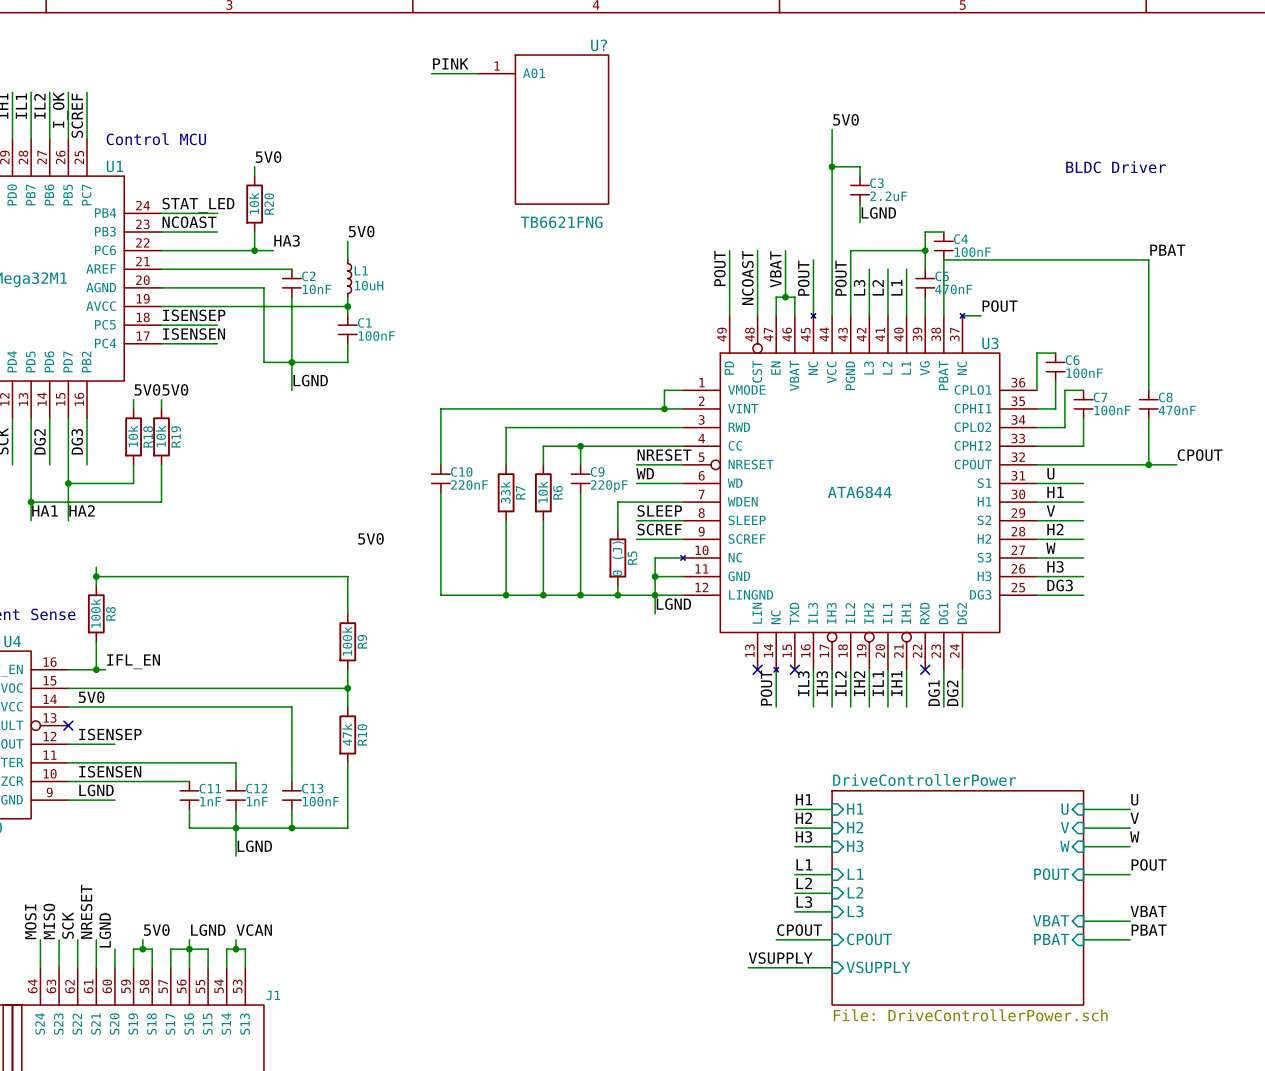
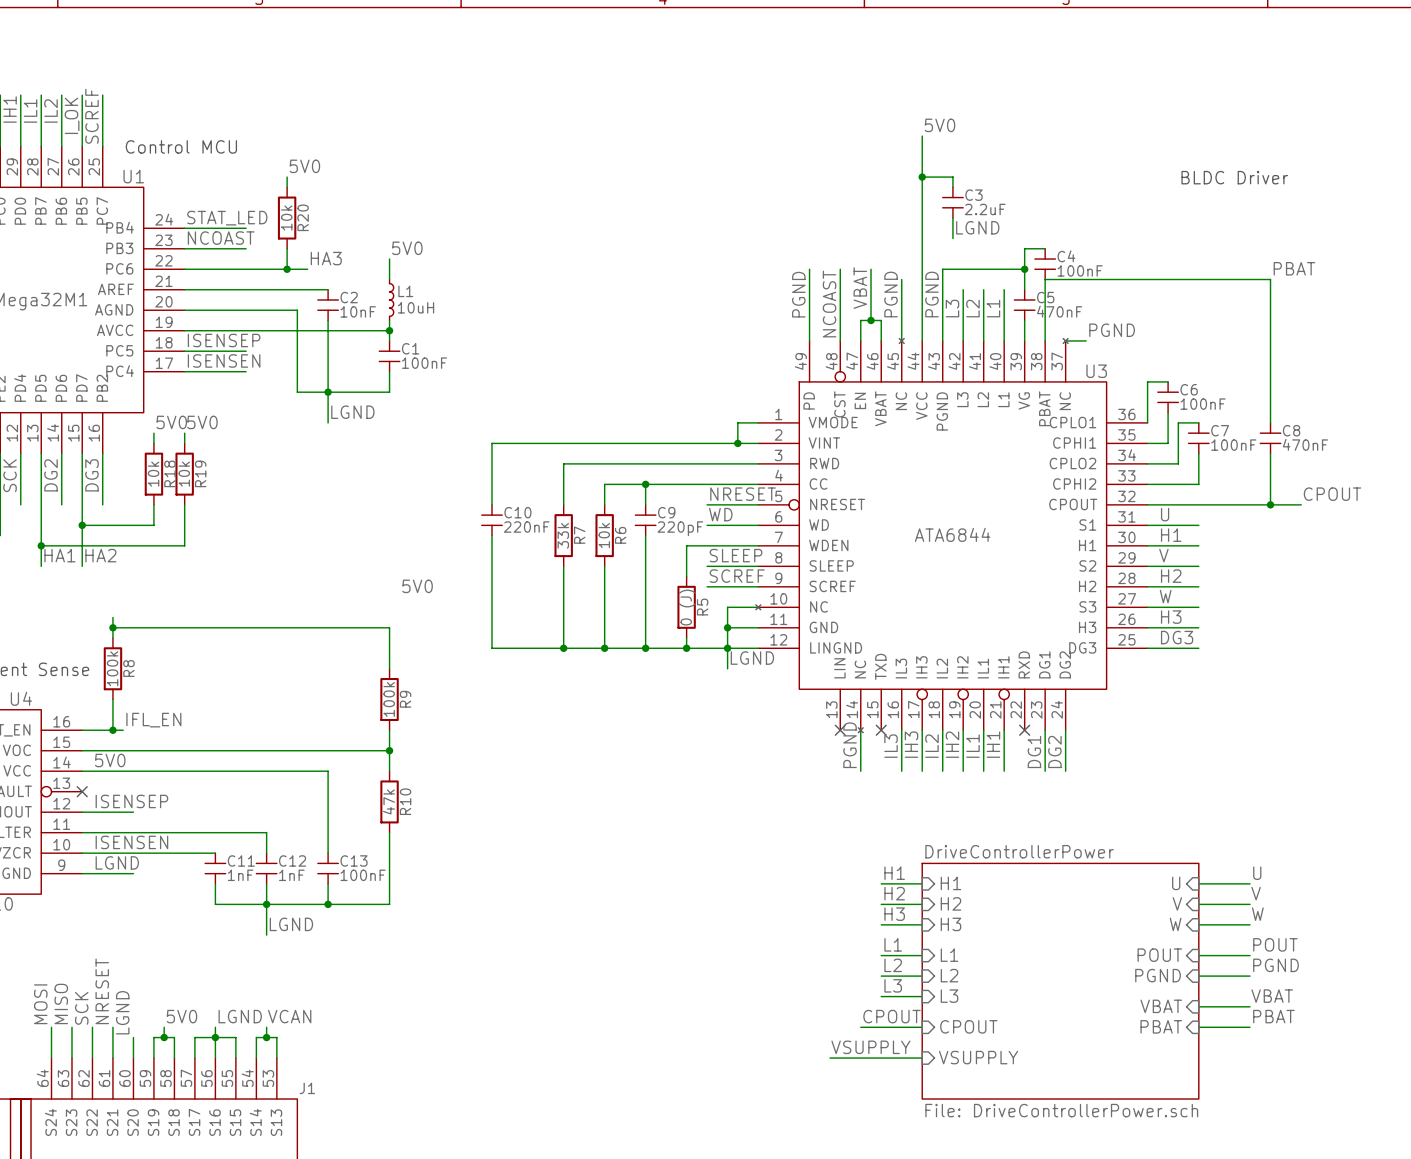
label: PINK (450, 63) -> none
wire: (431, 73) (478, 73) -> none
U?: TB6621FNG (543, 129) -> none
label: POUT (719, 268) -> PGND (798, 294)
label: POUT (803, 278) -> PGND (891, 294)
label: POUT (840, 278) -> PGND (931, 294)
label: POUT (1000, 306) -> PGND (1112, 330)
label: POUT (766, 687) -> PGND (850, 745)
label: none -> PGND (1276, 965)
sheet pin: none -> PGND (1158, 975)
wire: none -> (1198, 976) (1250, 976)

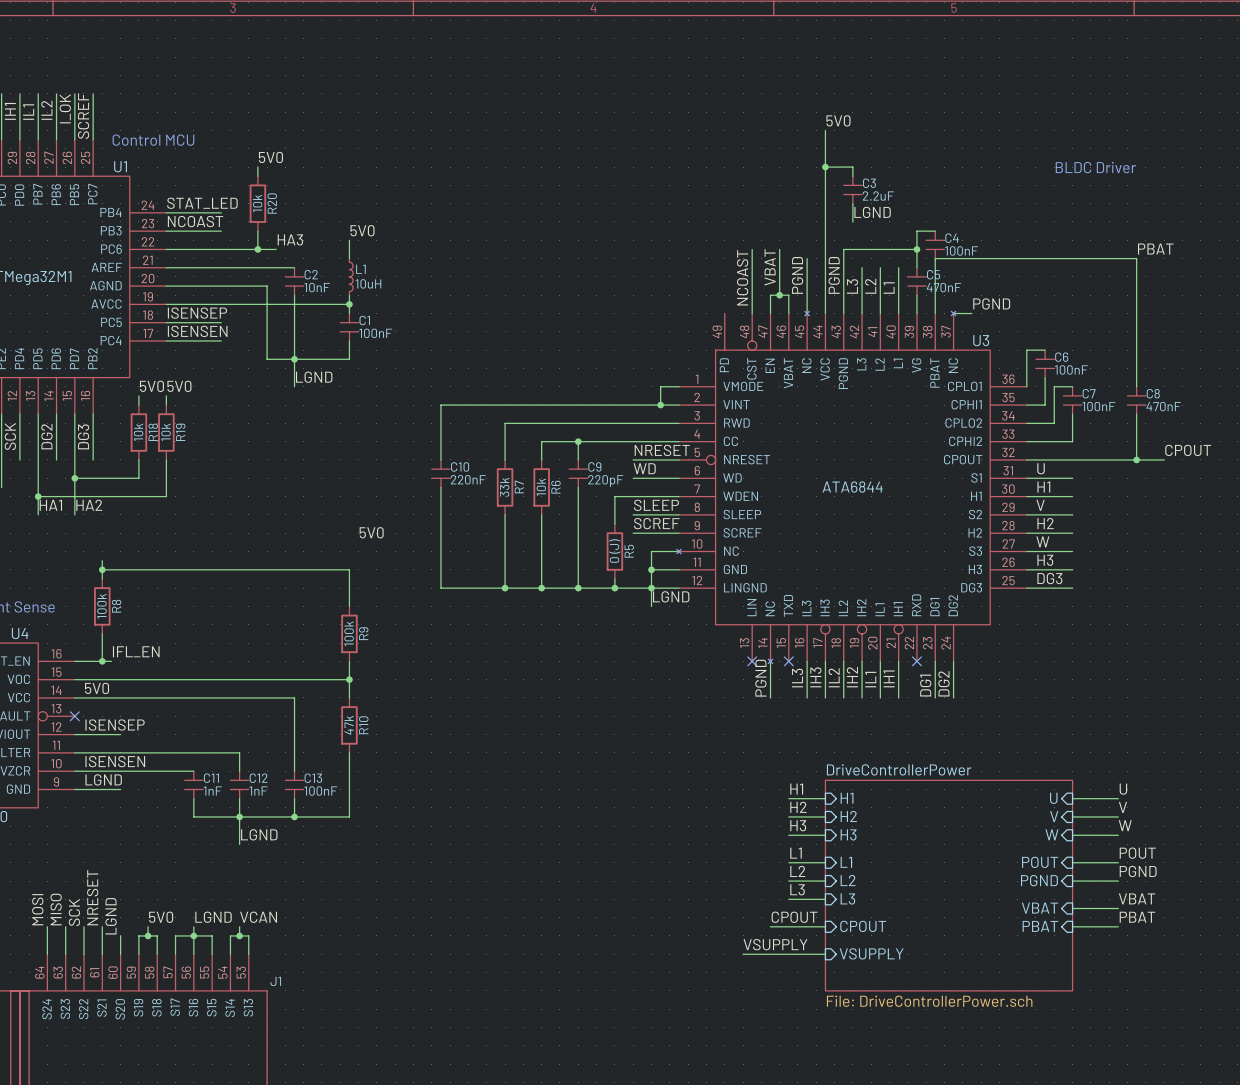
wire: (809, 269) (809, 340) -> none
label: PGND (798, 294) -> none

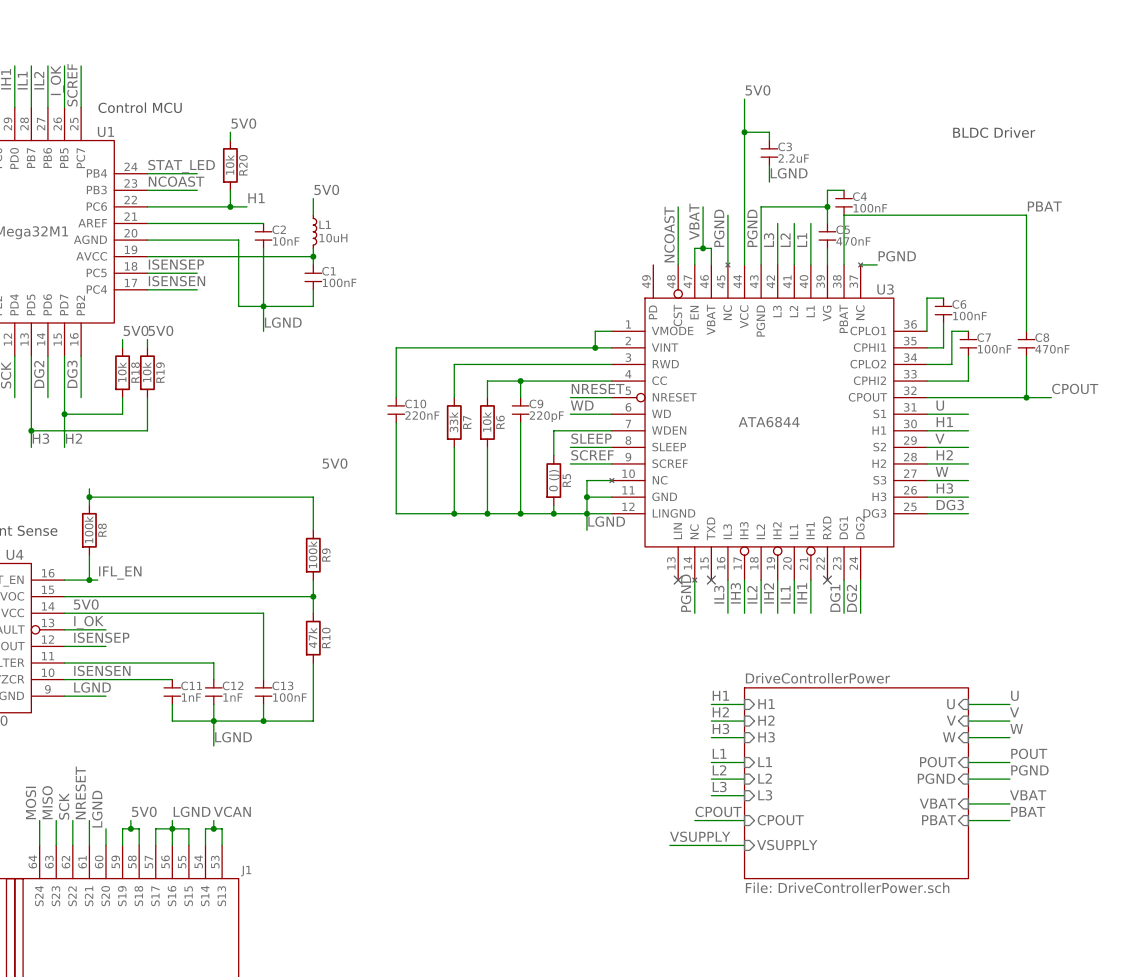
label: HA3 (290, 239) -> H1 (256, 198)
label: HA1 (50, 505) -> H3 (40, 438)
label: HA2 (89, 505) -> H2 (73, 438)
label: none -> I_OK (88, 622)
wire: none -> (64, 629) (105, 629)
no-connect mark: (74, 716) -> none

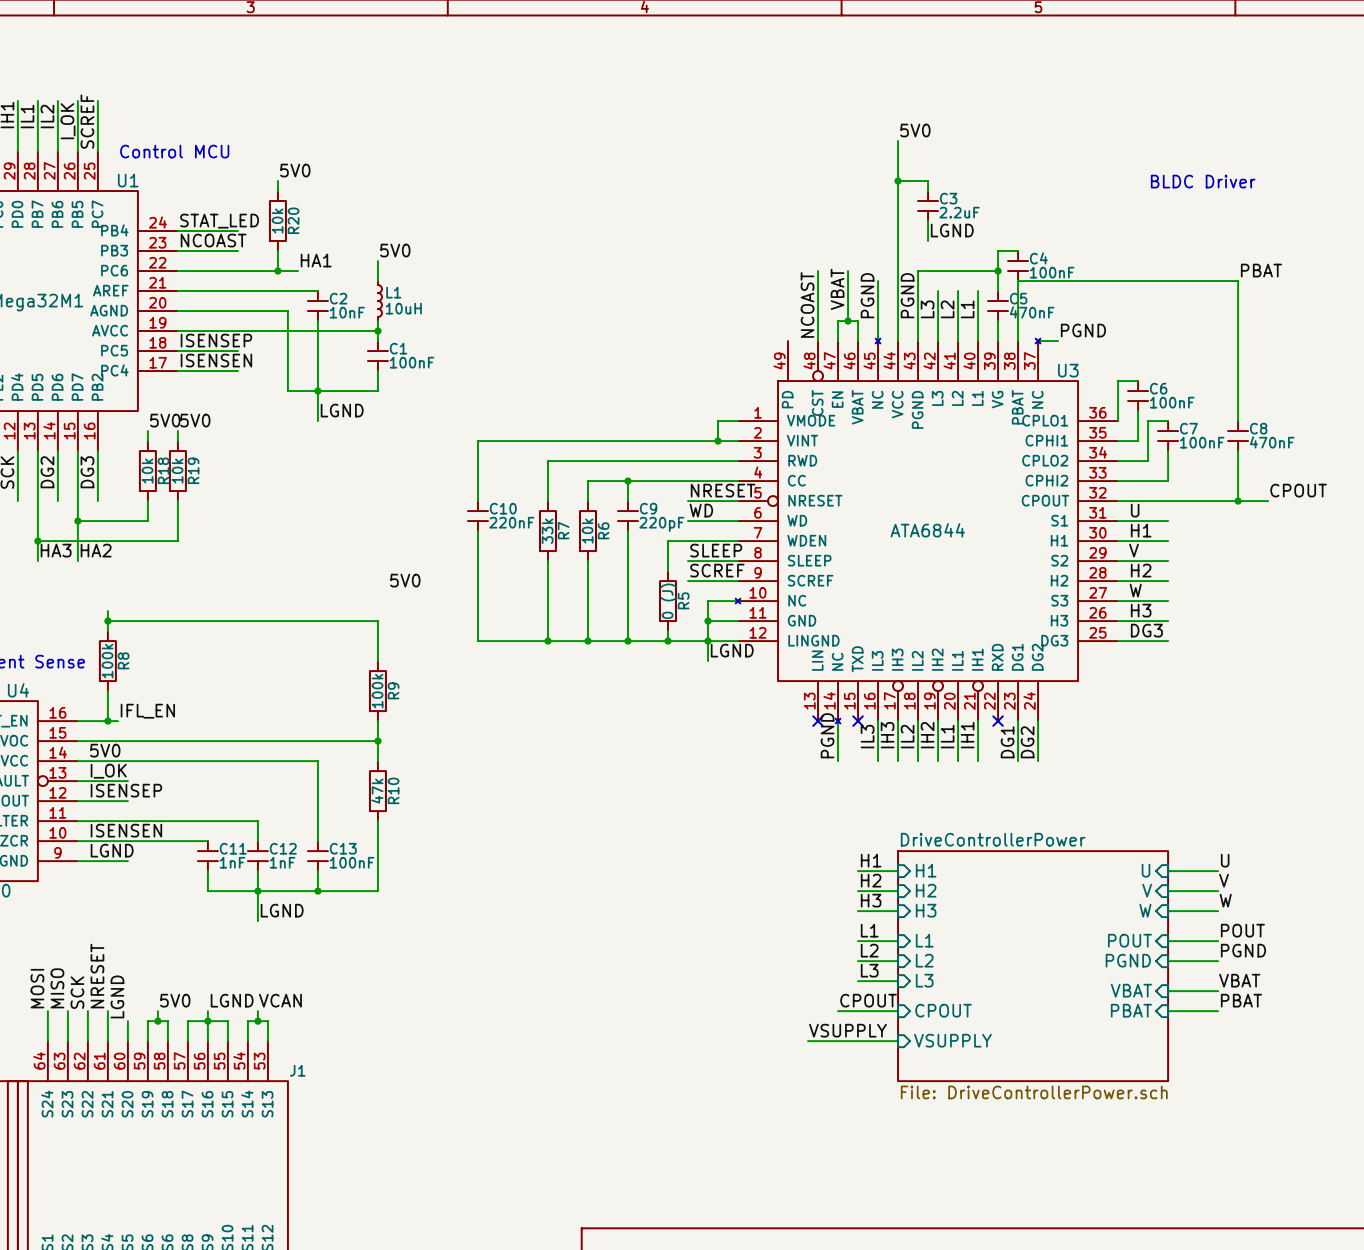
label: H1 (256, 198) -> HA1 (316, 260)
label: H3 (40, 438) -> HA3 (56, 550)
label: H2 (73, 438) -> HA2 (96, 550)

